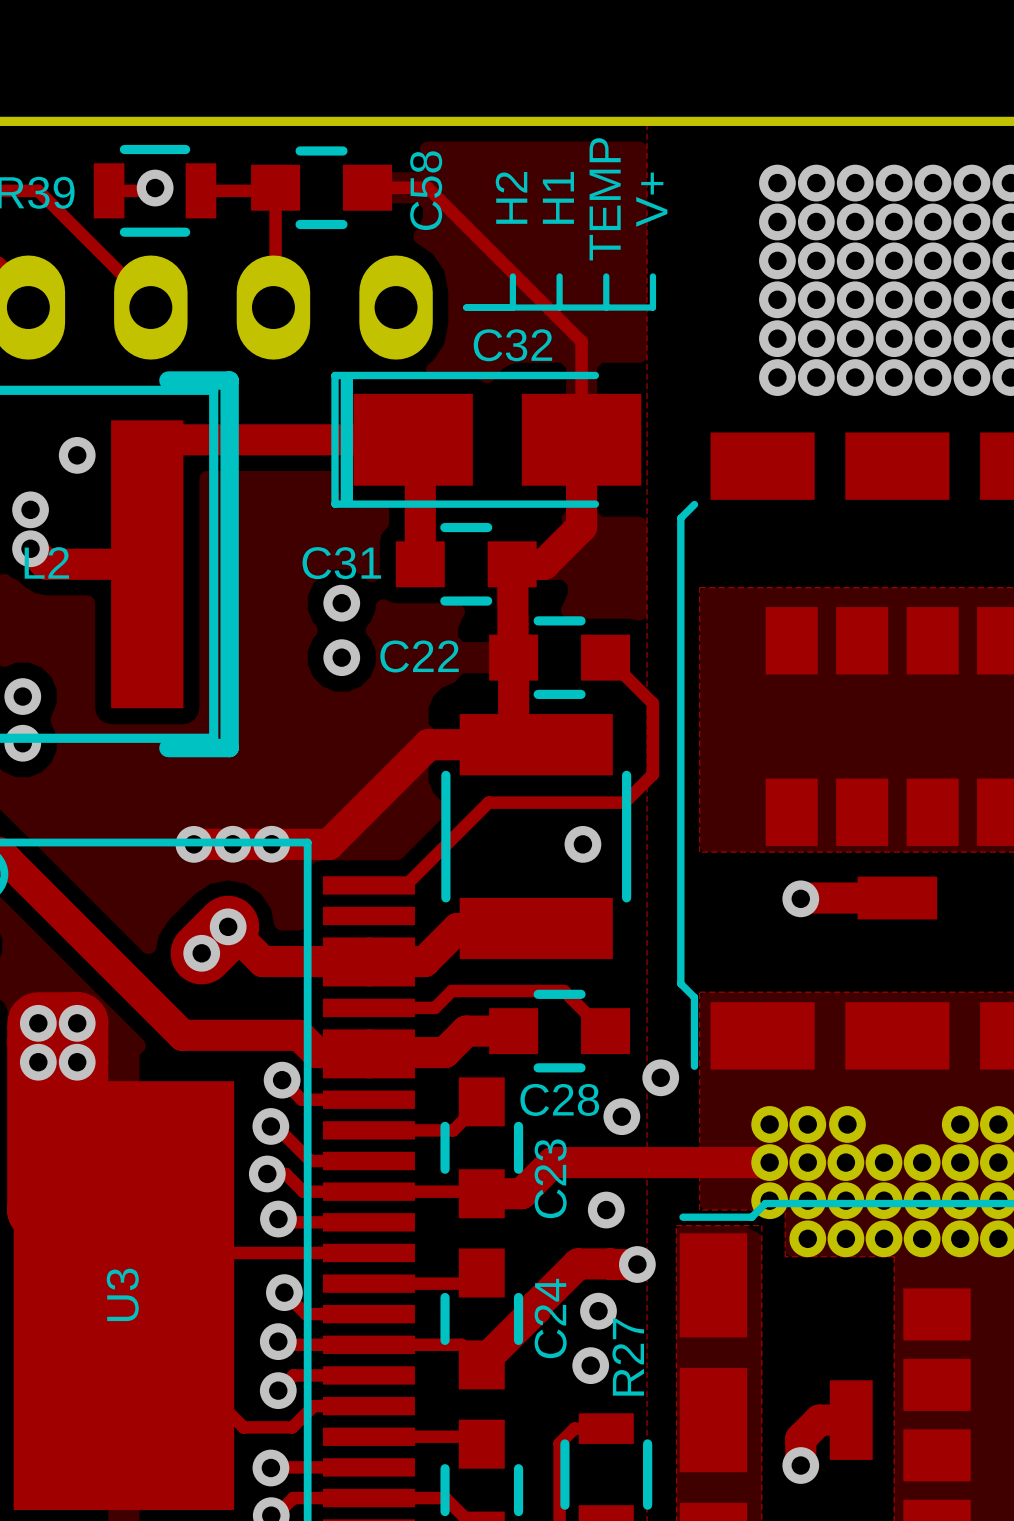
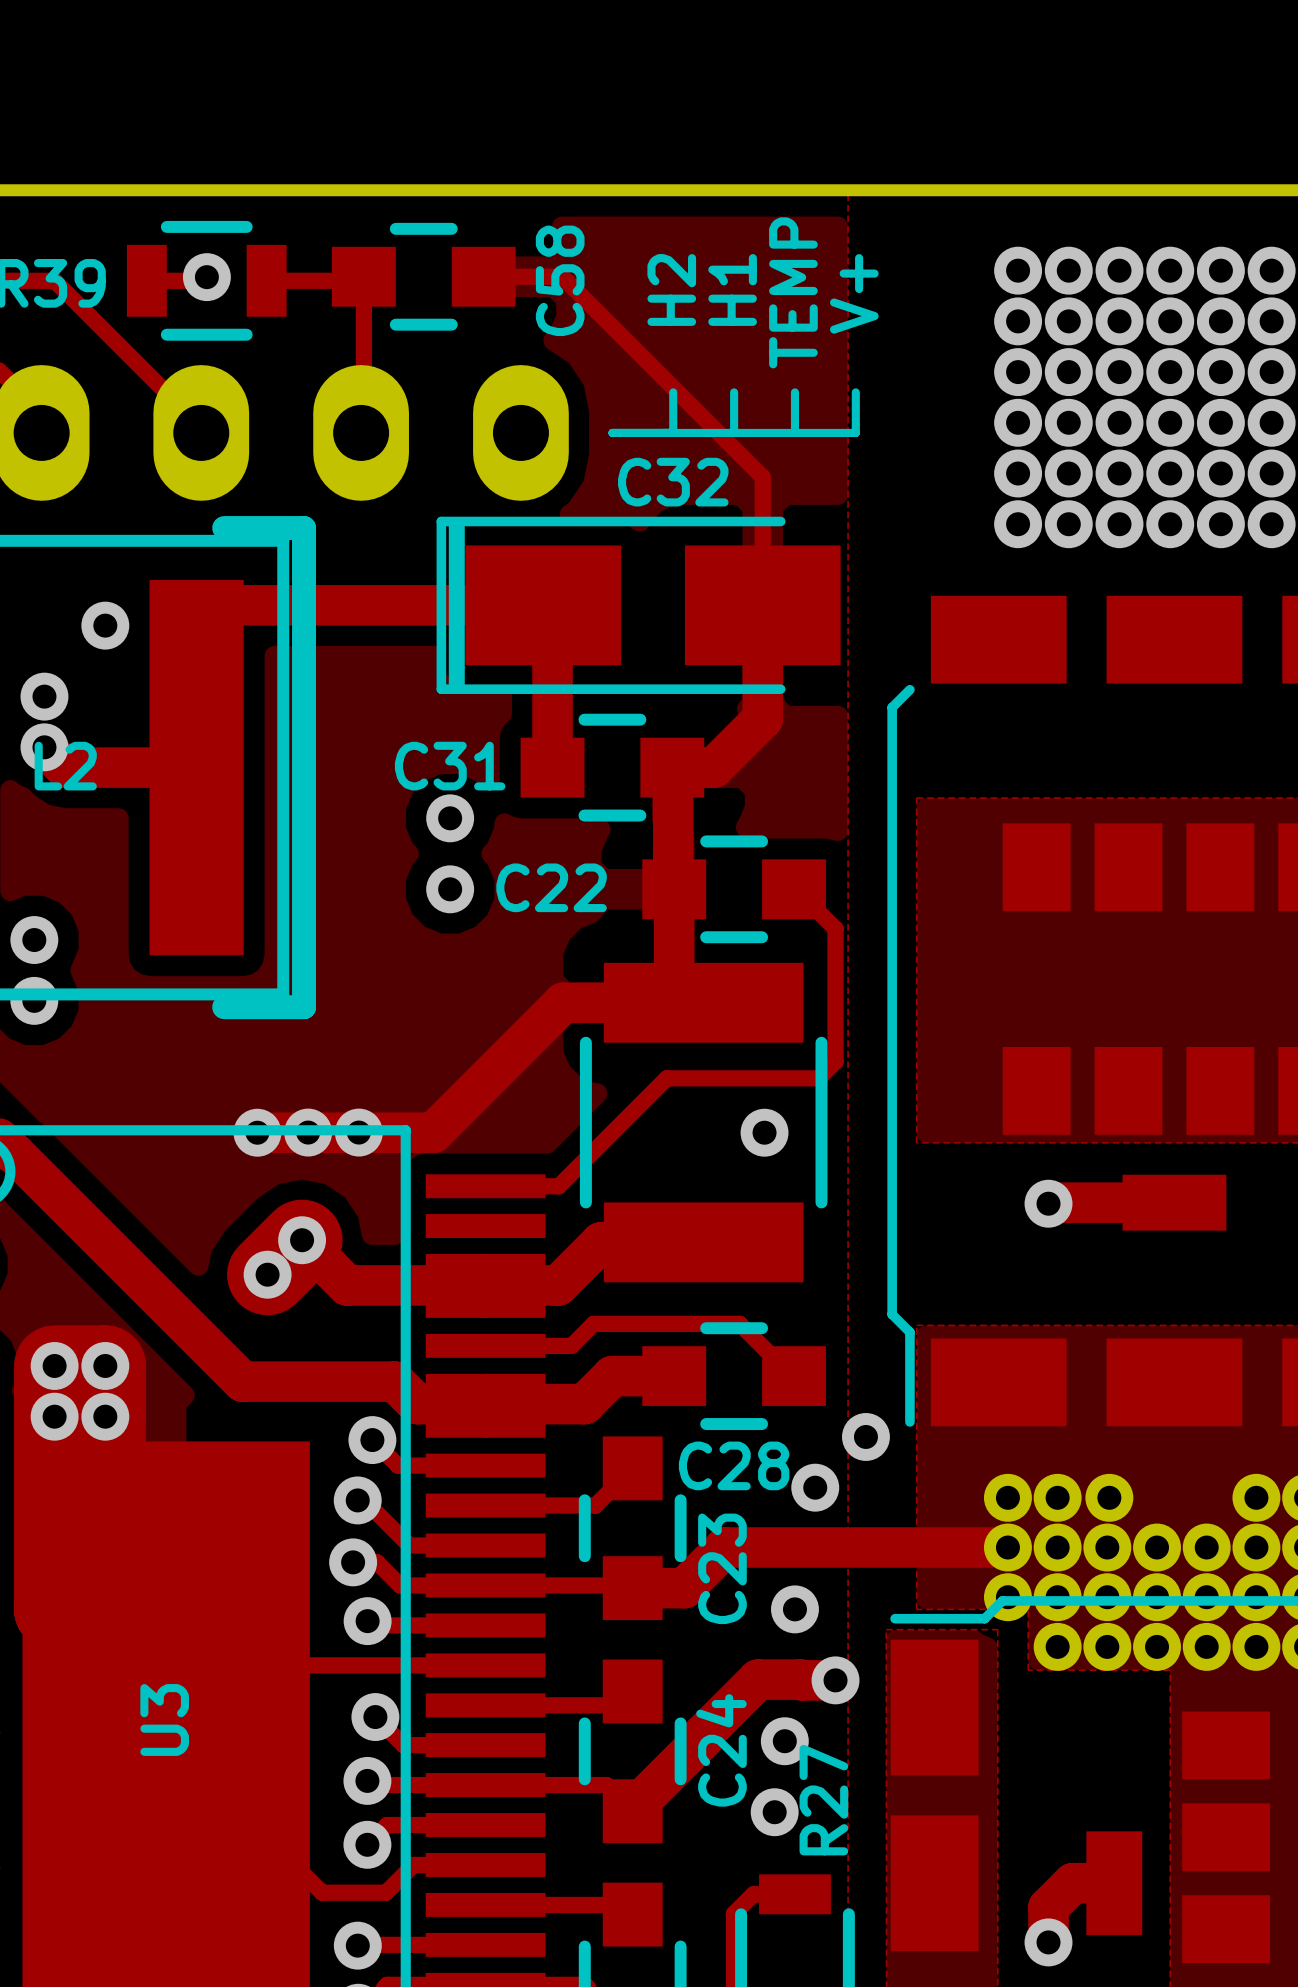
track: (637, 687) (652, 703) (652, 774) (637, 789) -> (835, 928) (835, 1061)
track: (507, 802) (488, 802) (405, 885) -> (666, 1078) (558, 1186) (533, 1186)

